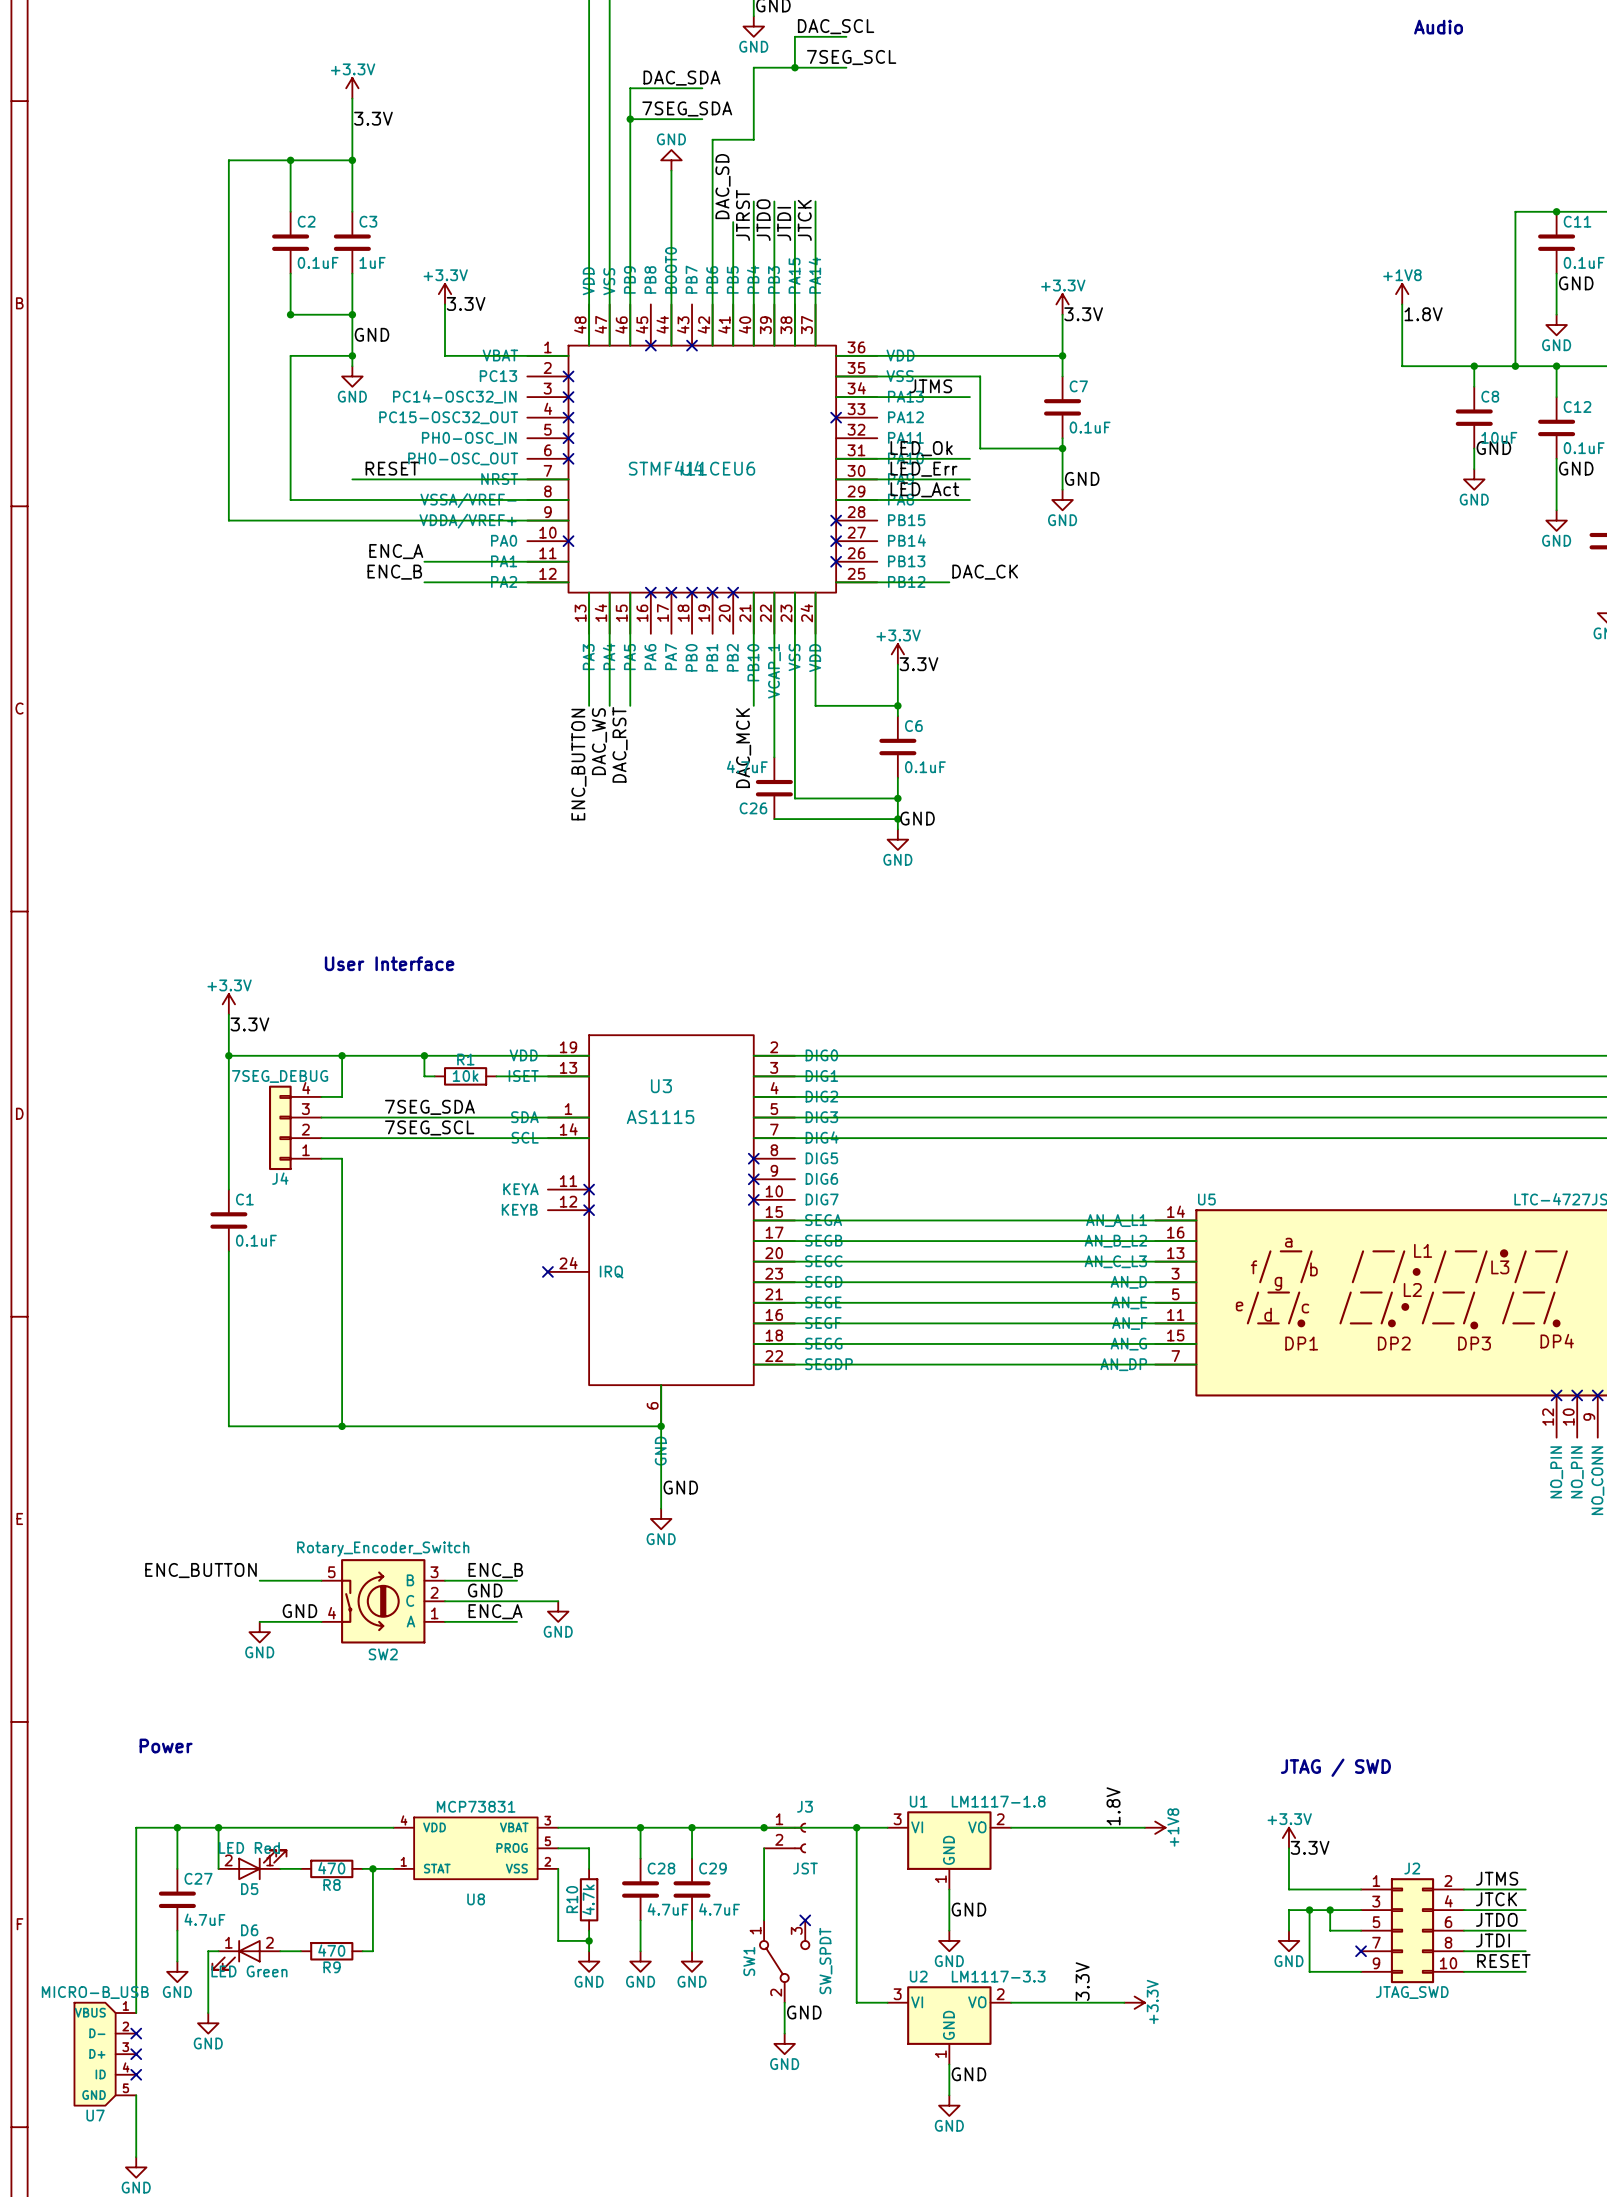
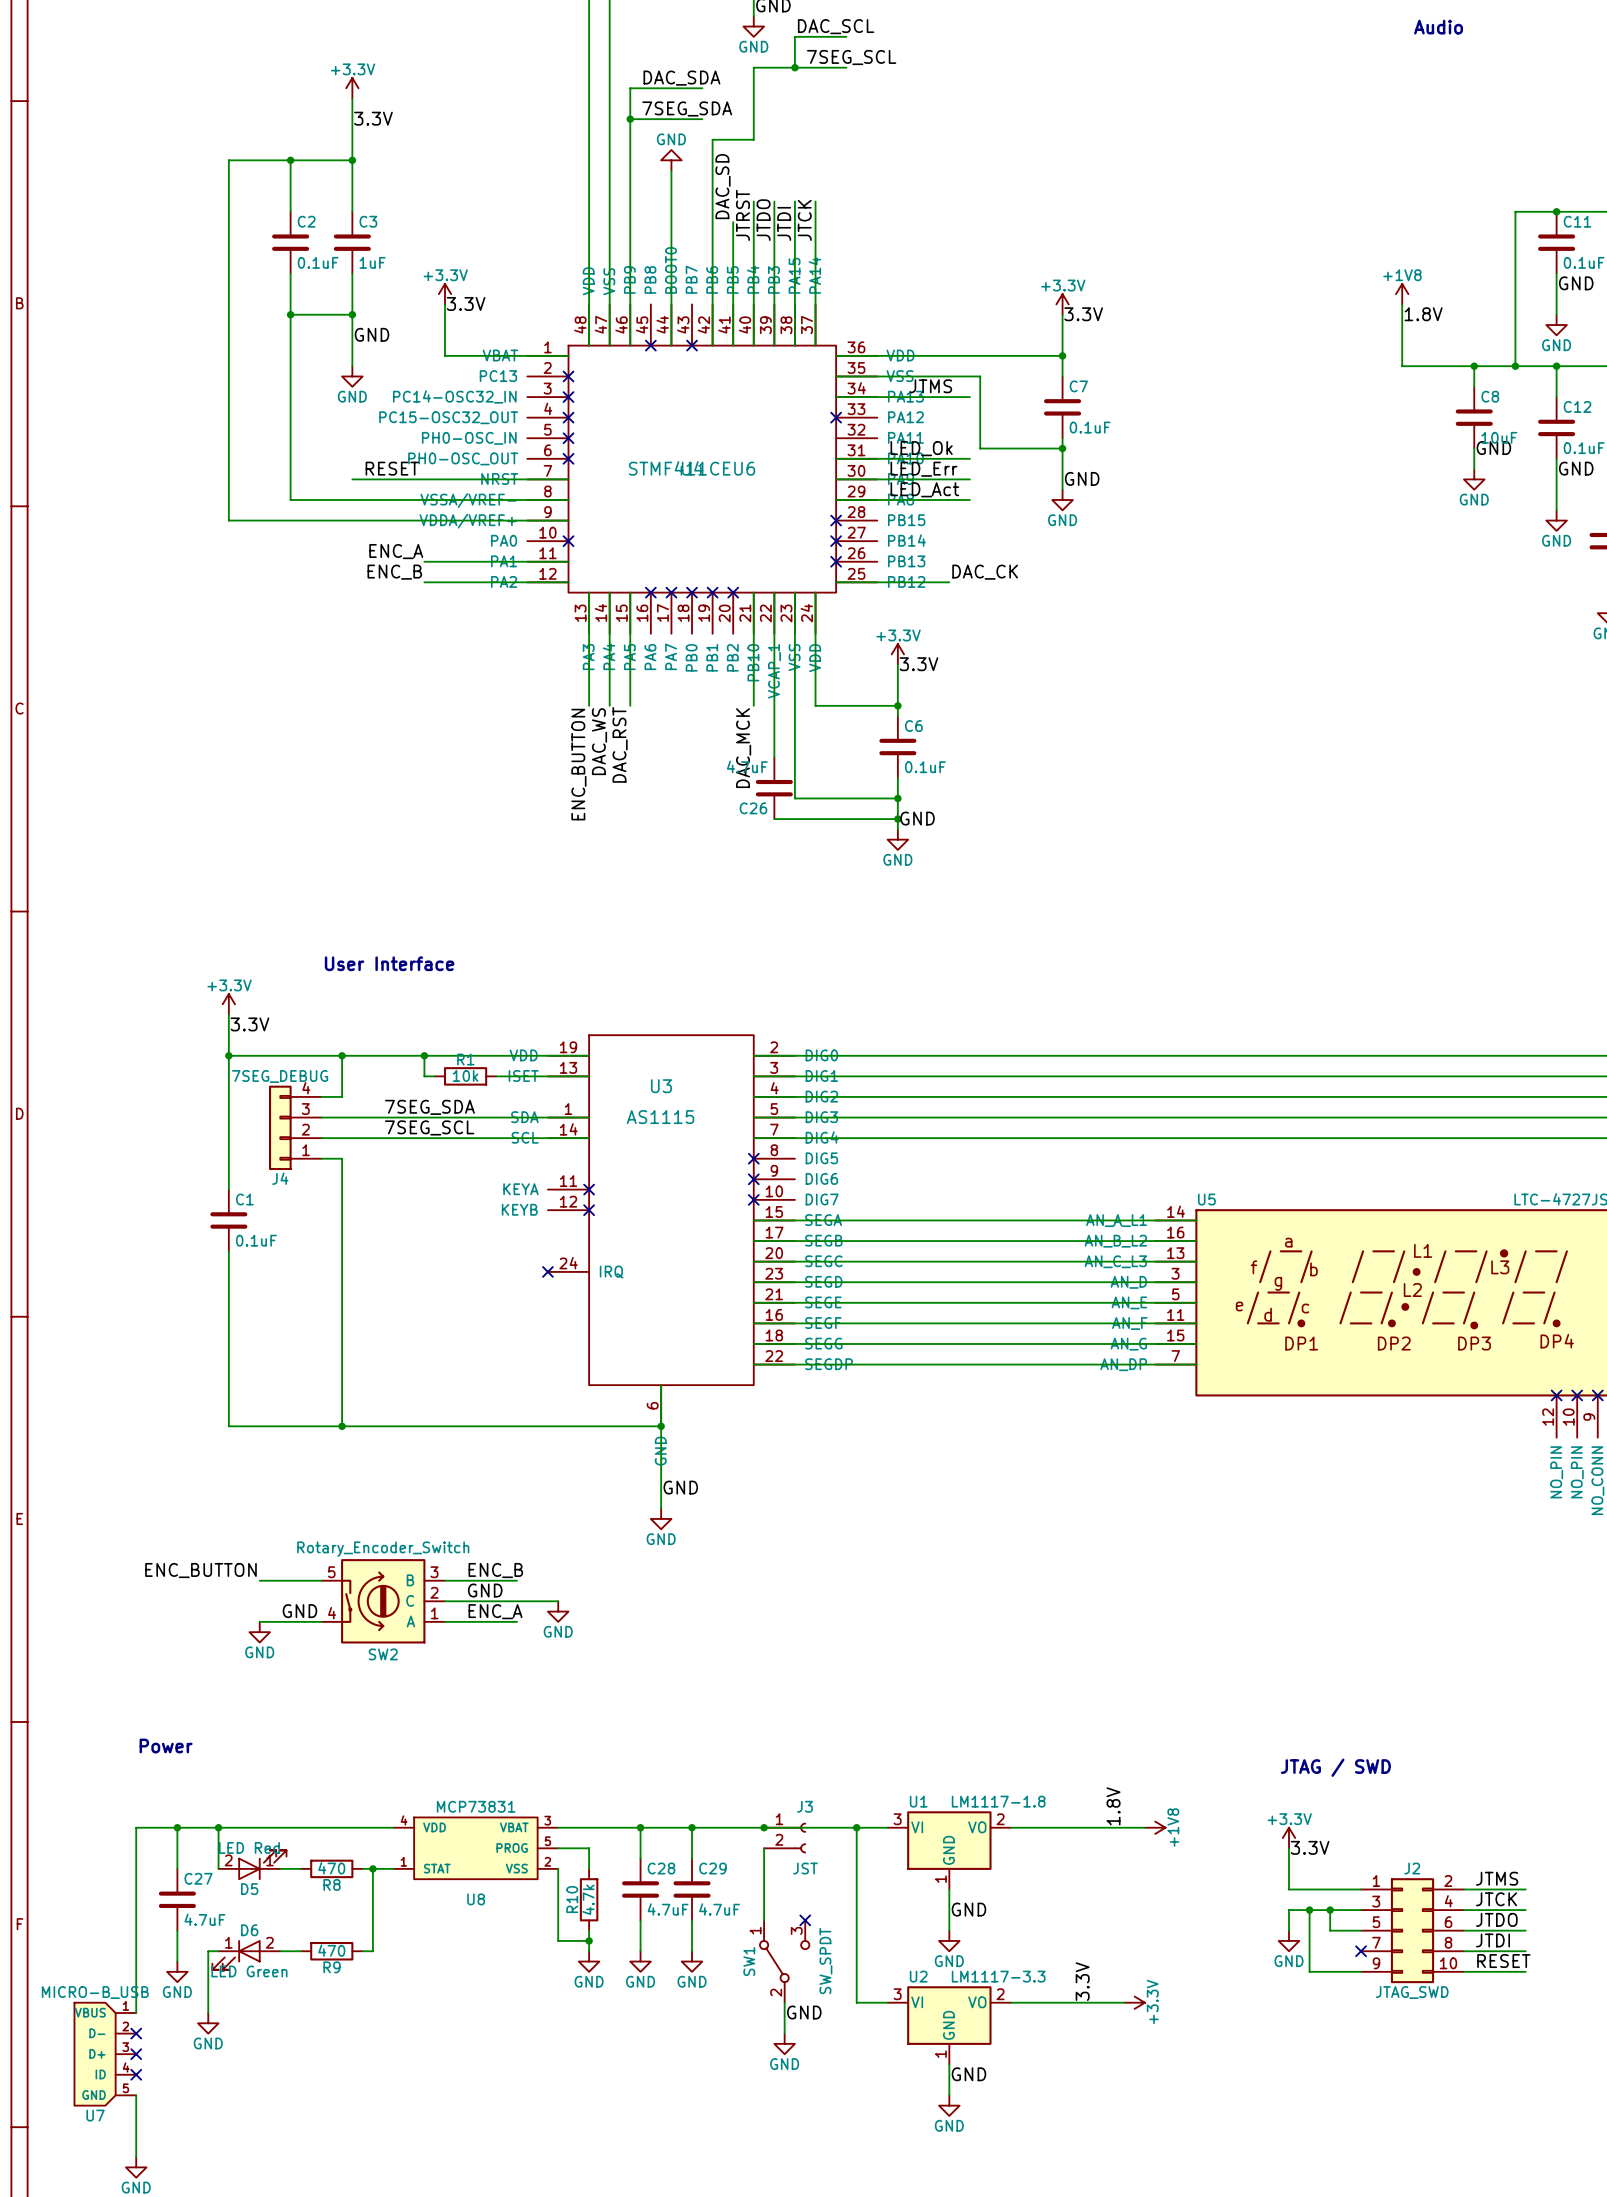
wire: (290, 355) (352, 355) -> (290, 355) (290, 314)
junction: (352, 355) -> none

